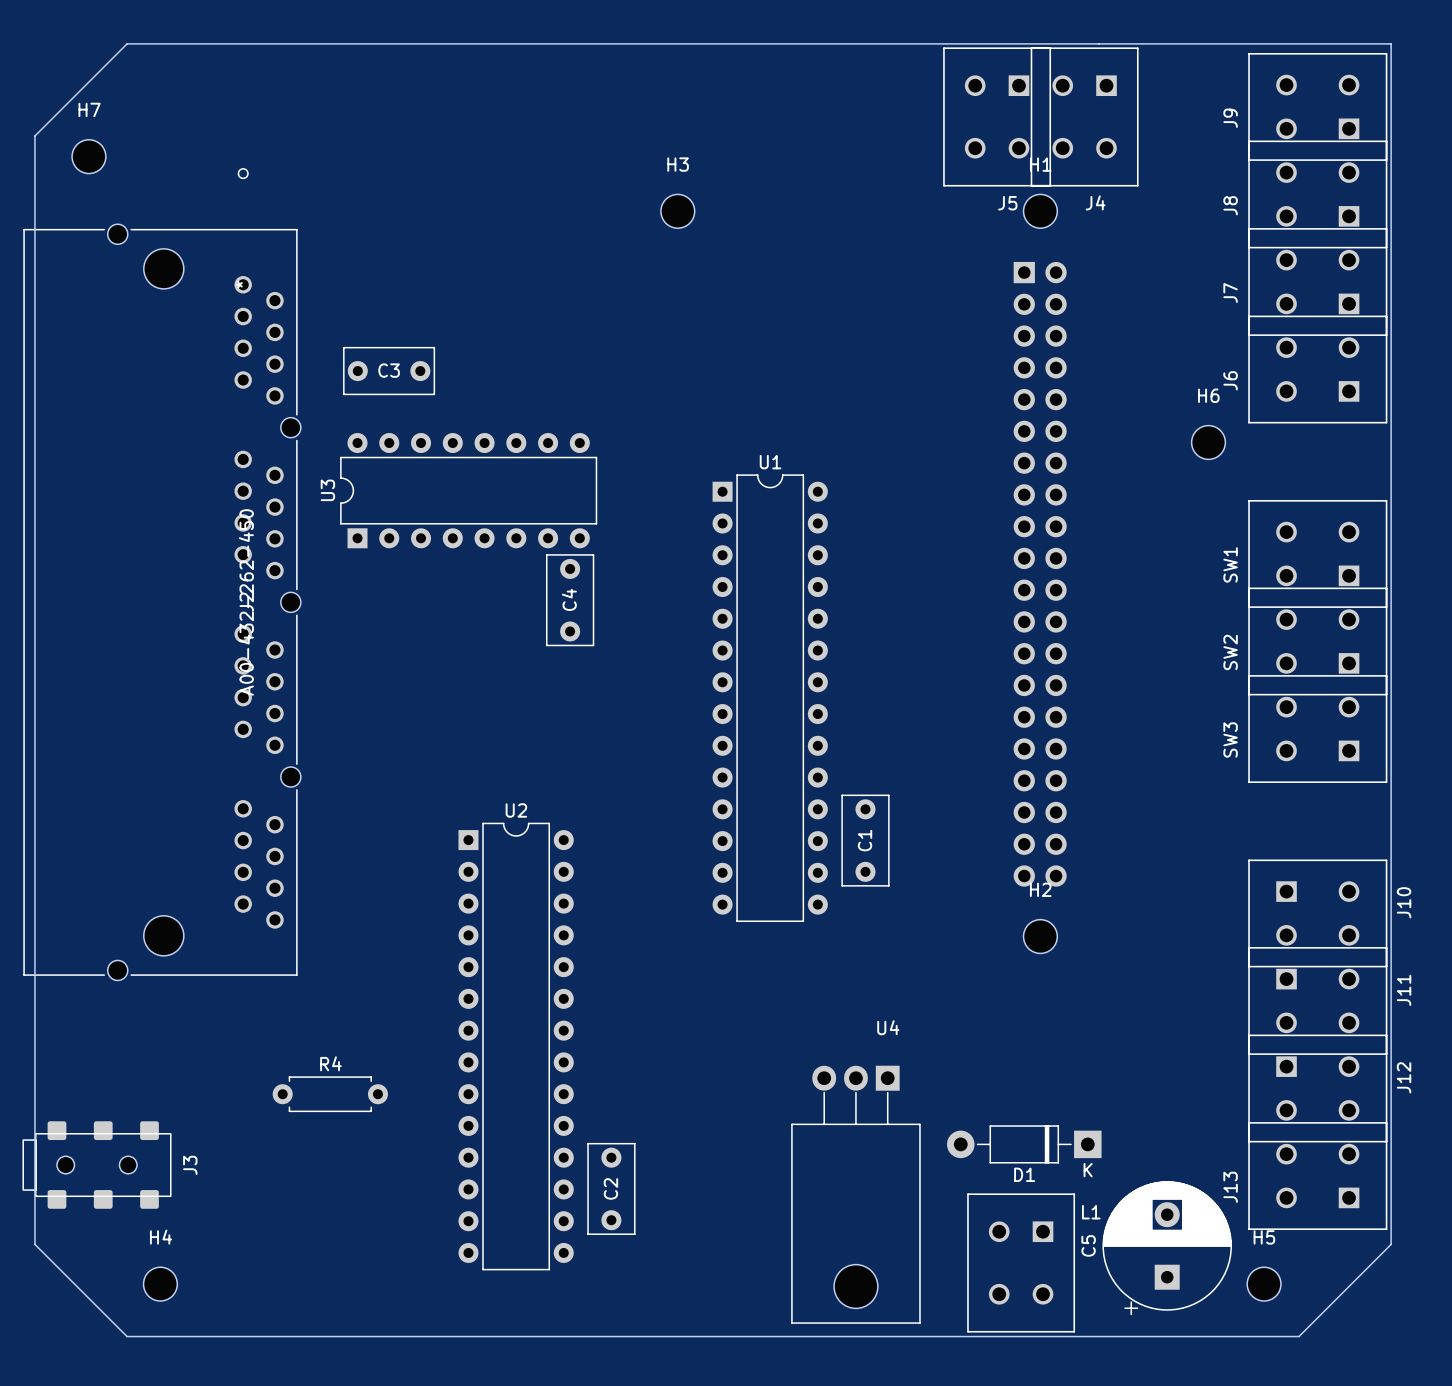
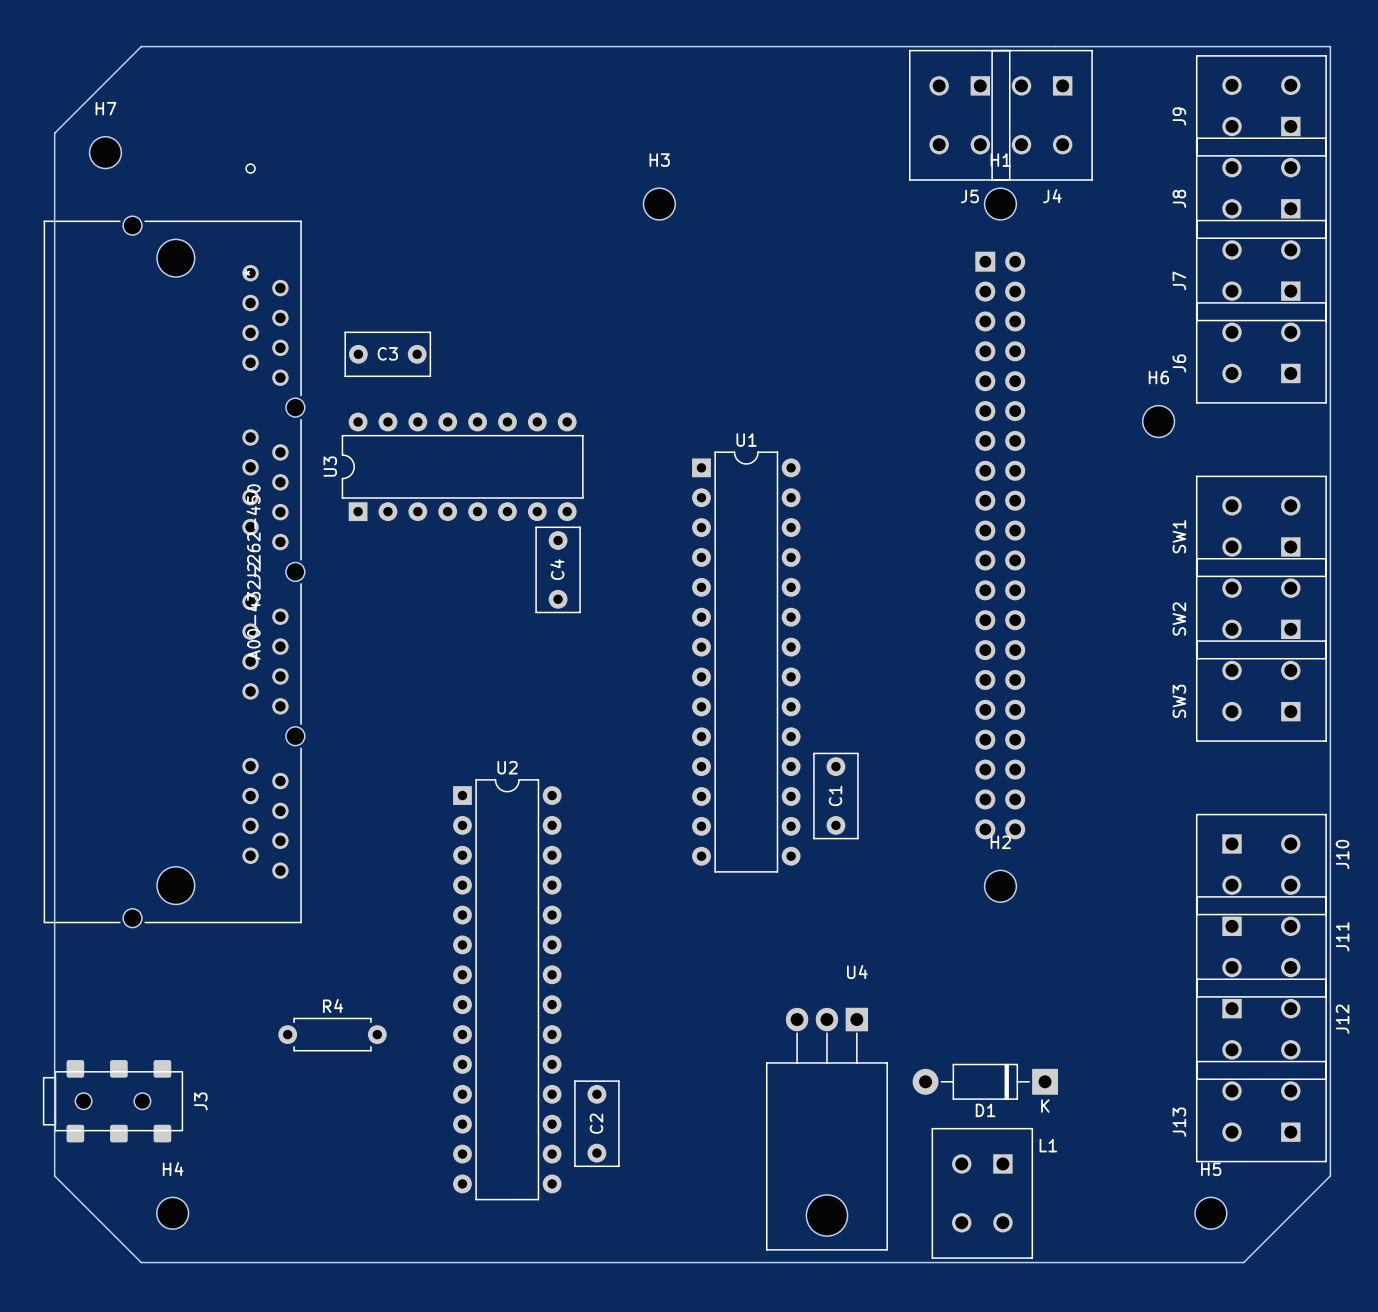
C5: (1167, 1248) -> none

